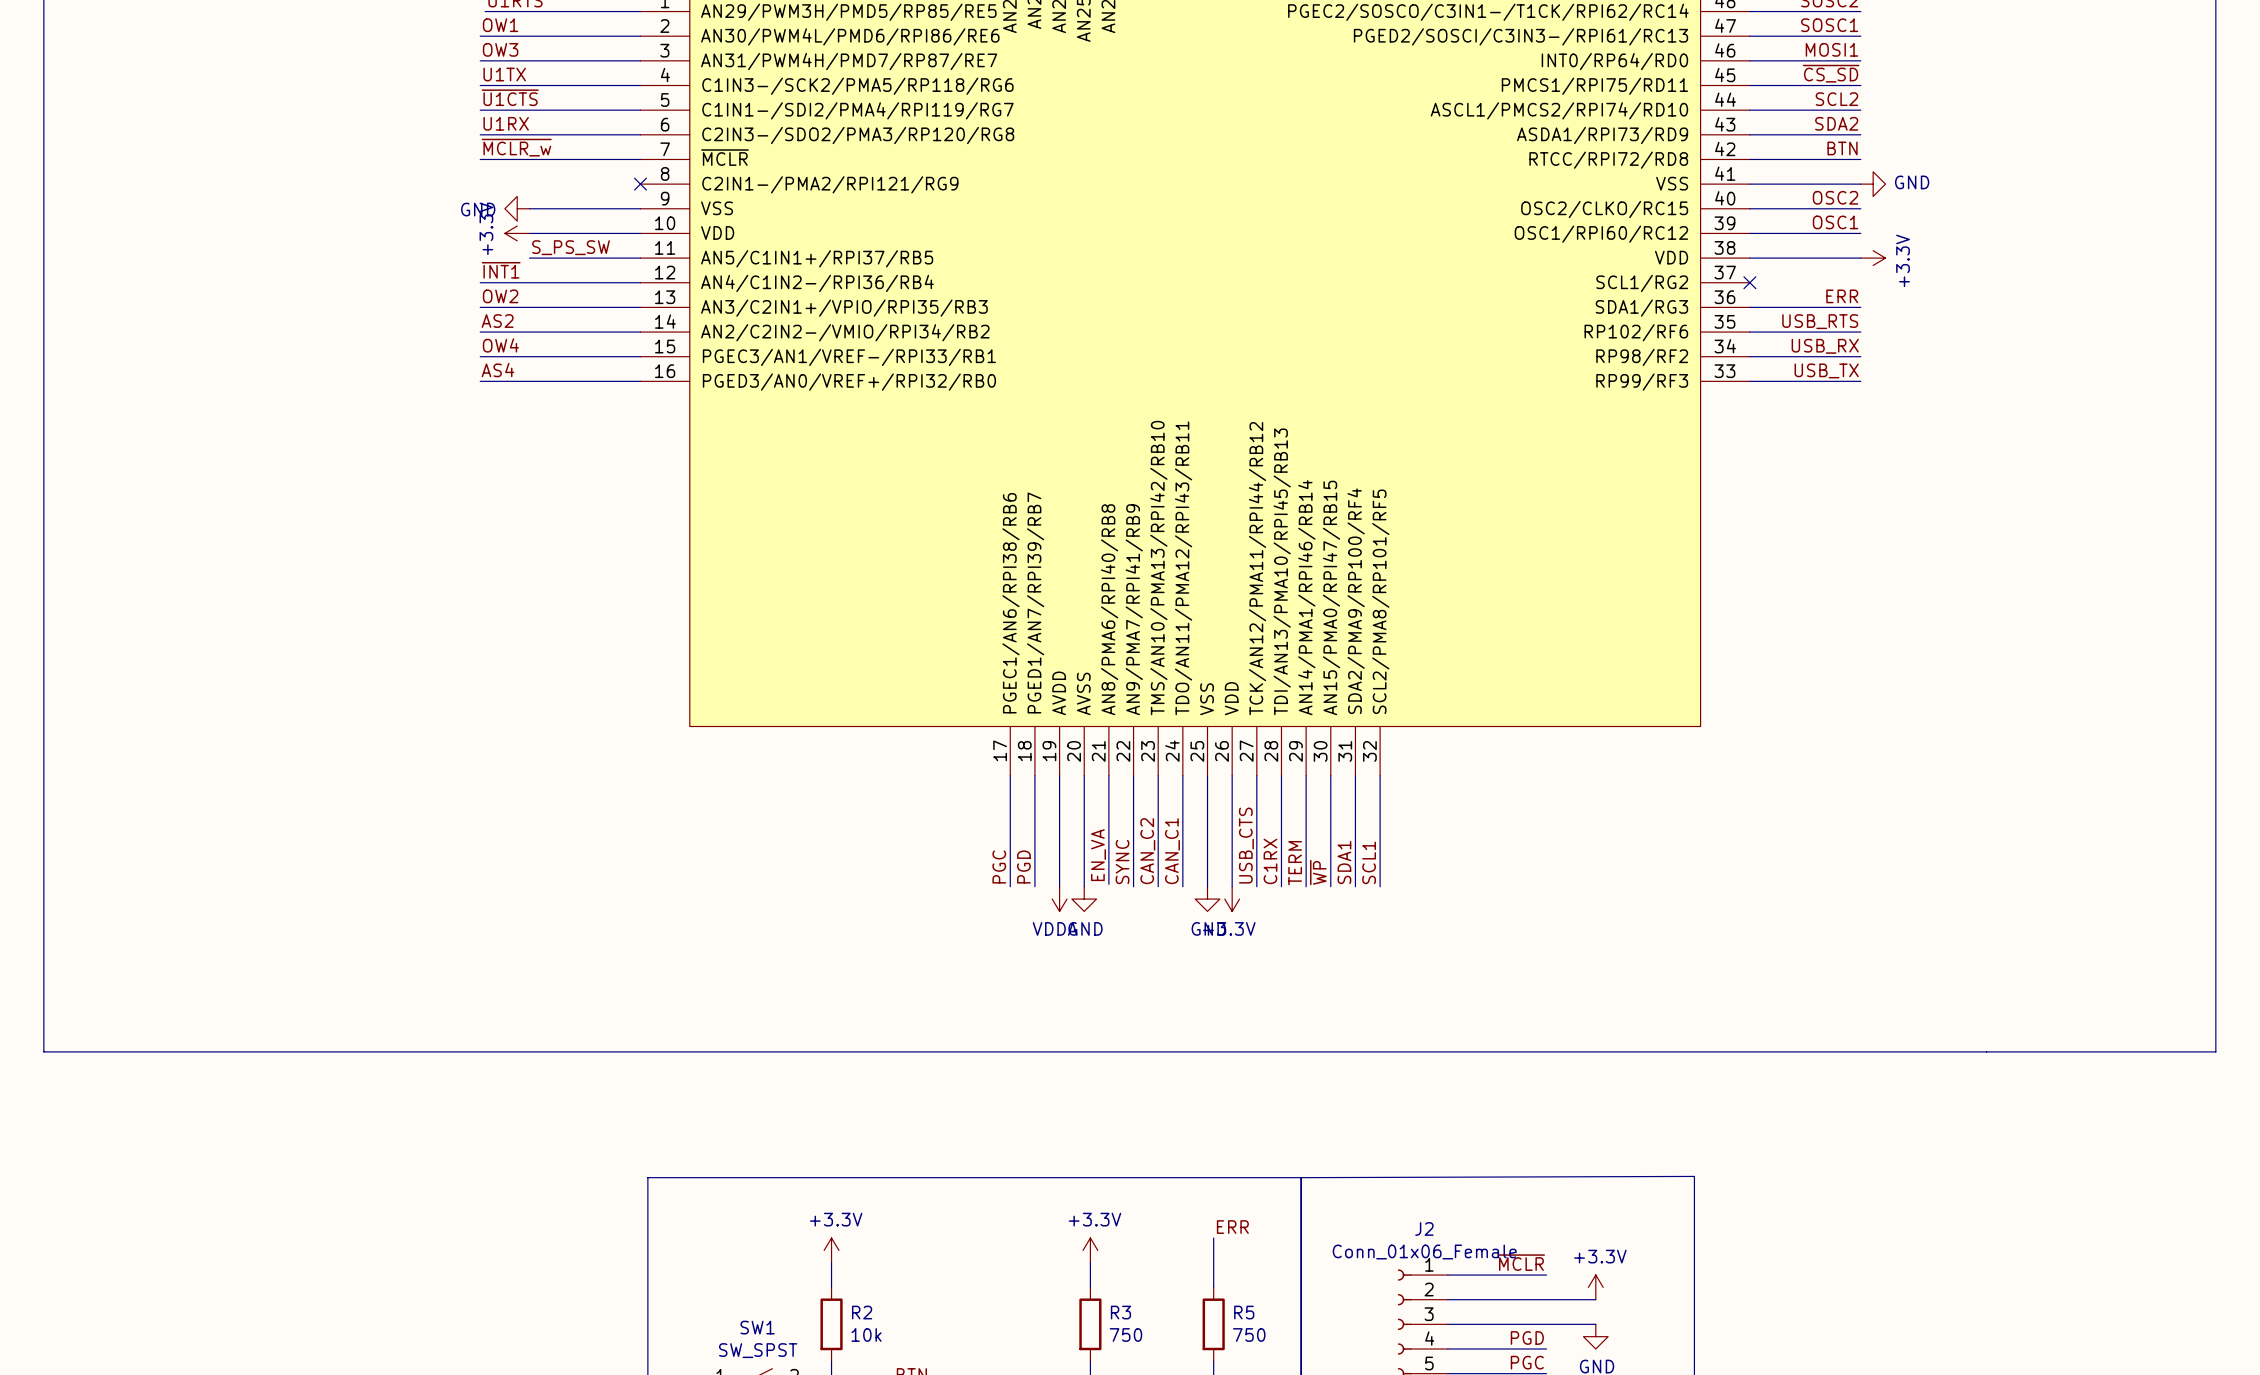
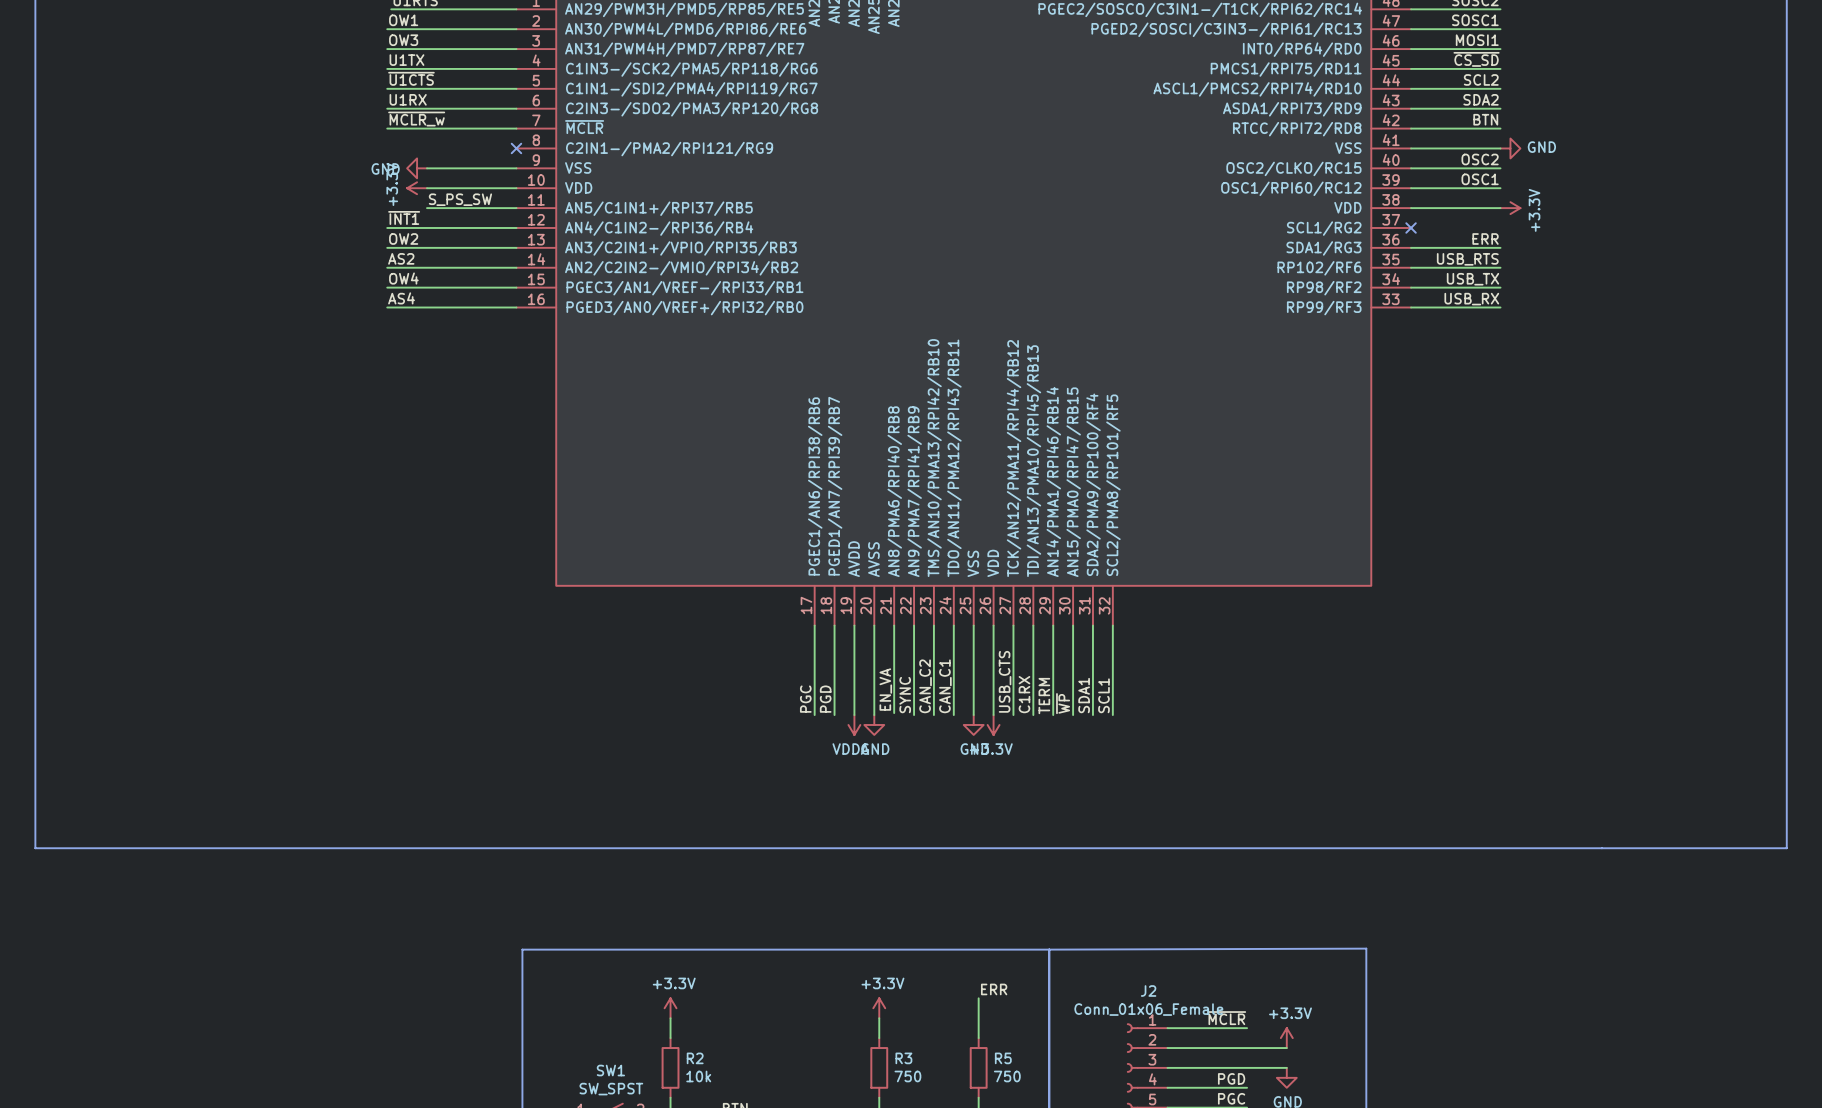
label: USB_RX (1825, 346) -> USB_TX (1472, 279)
label: USB_TX (1826, 370) -> USB_RX (1471, 299)

